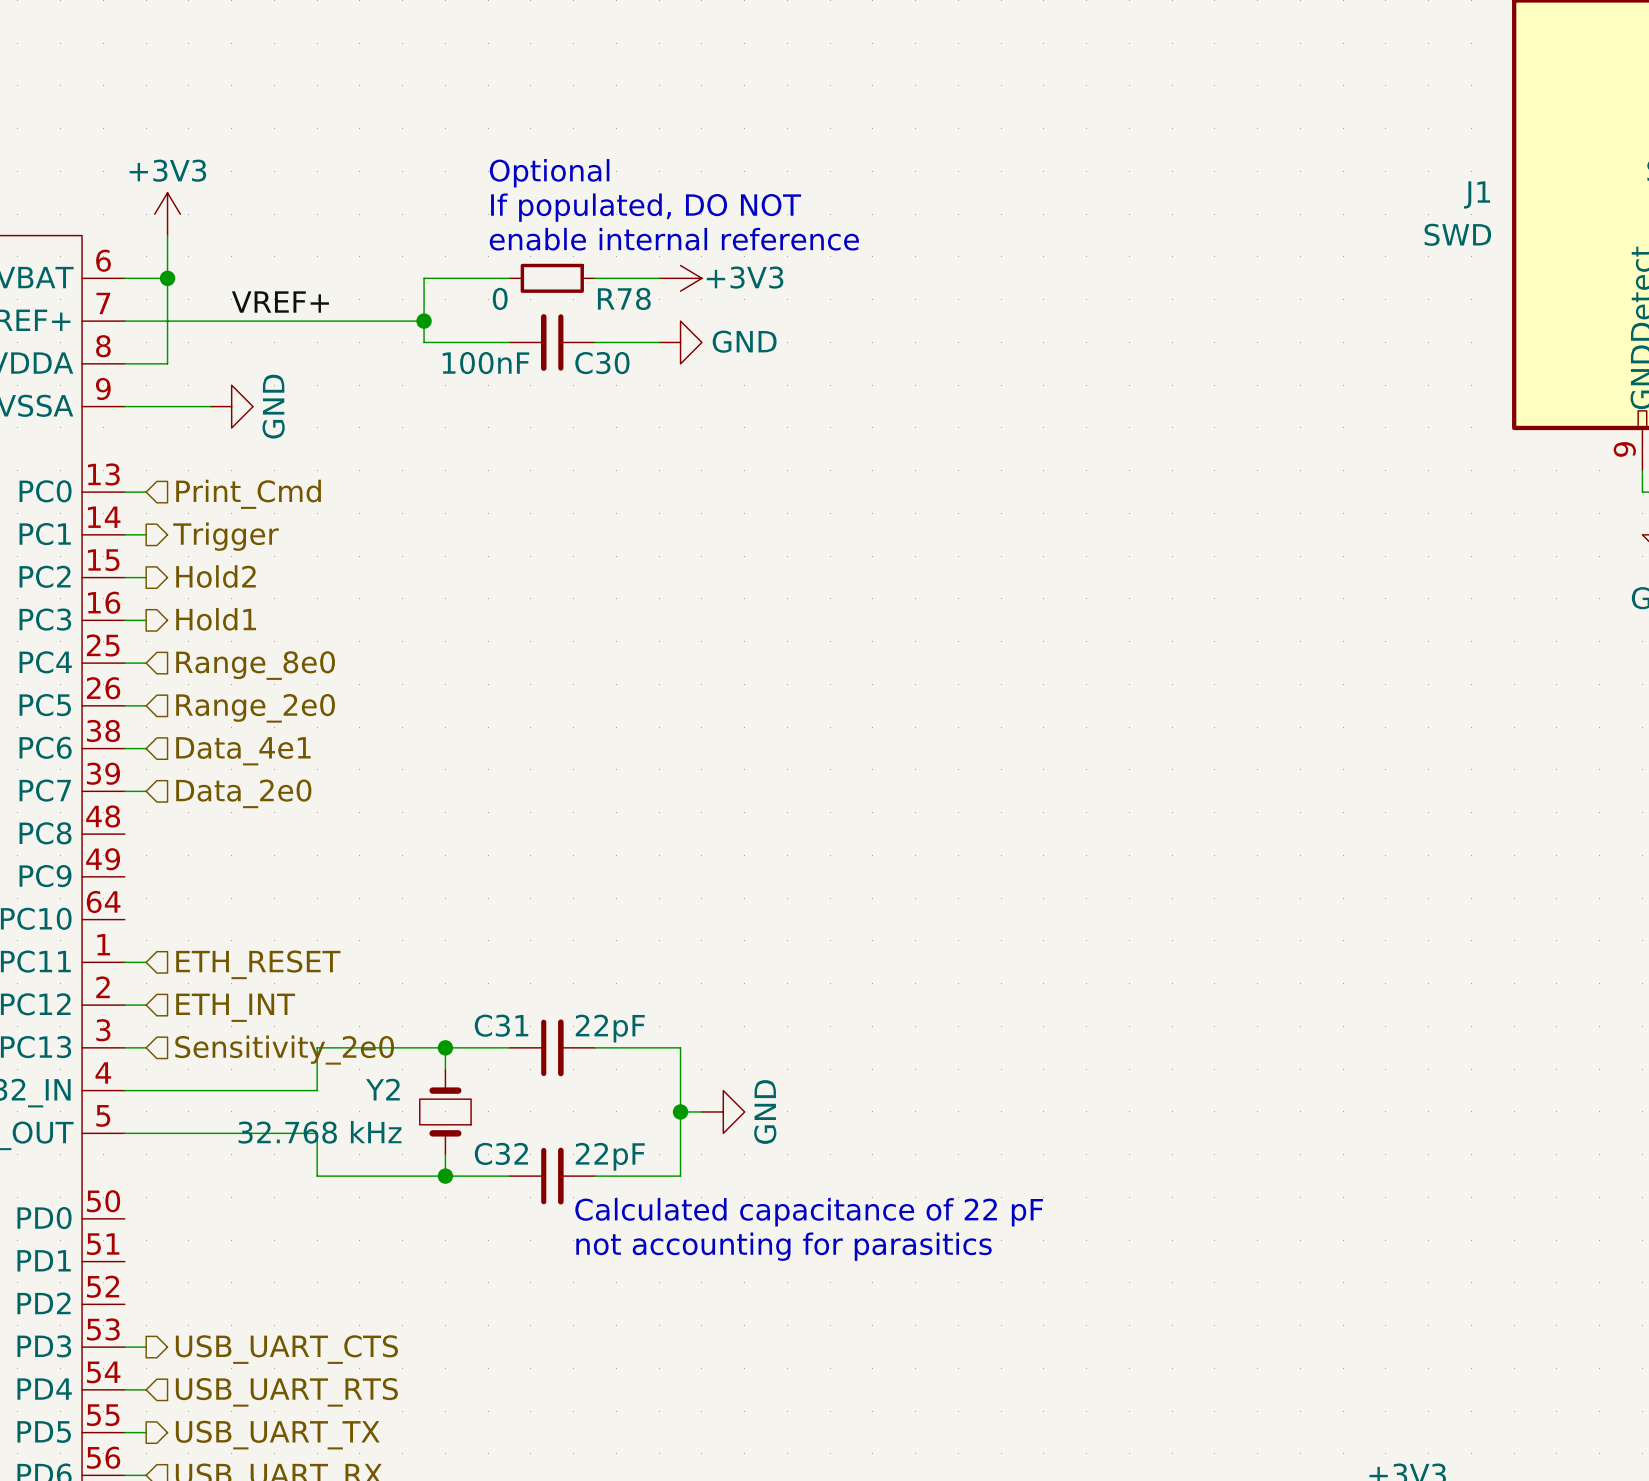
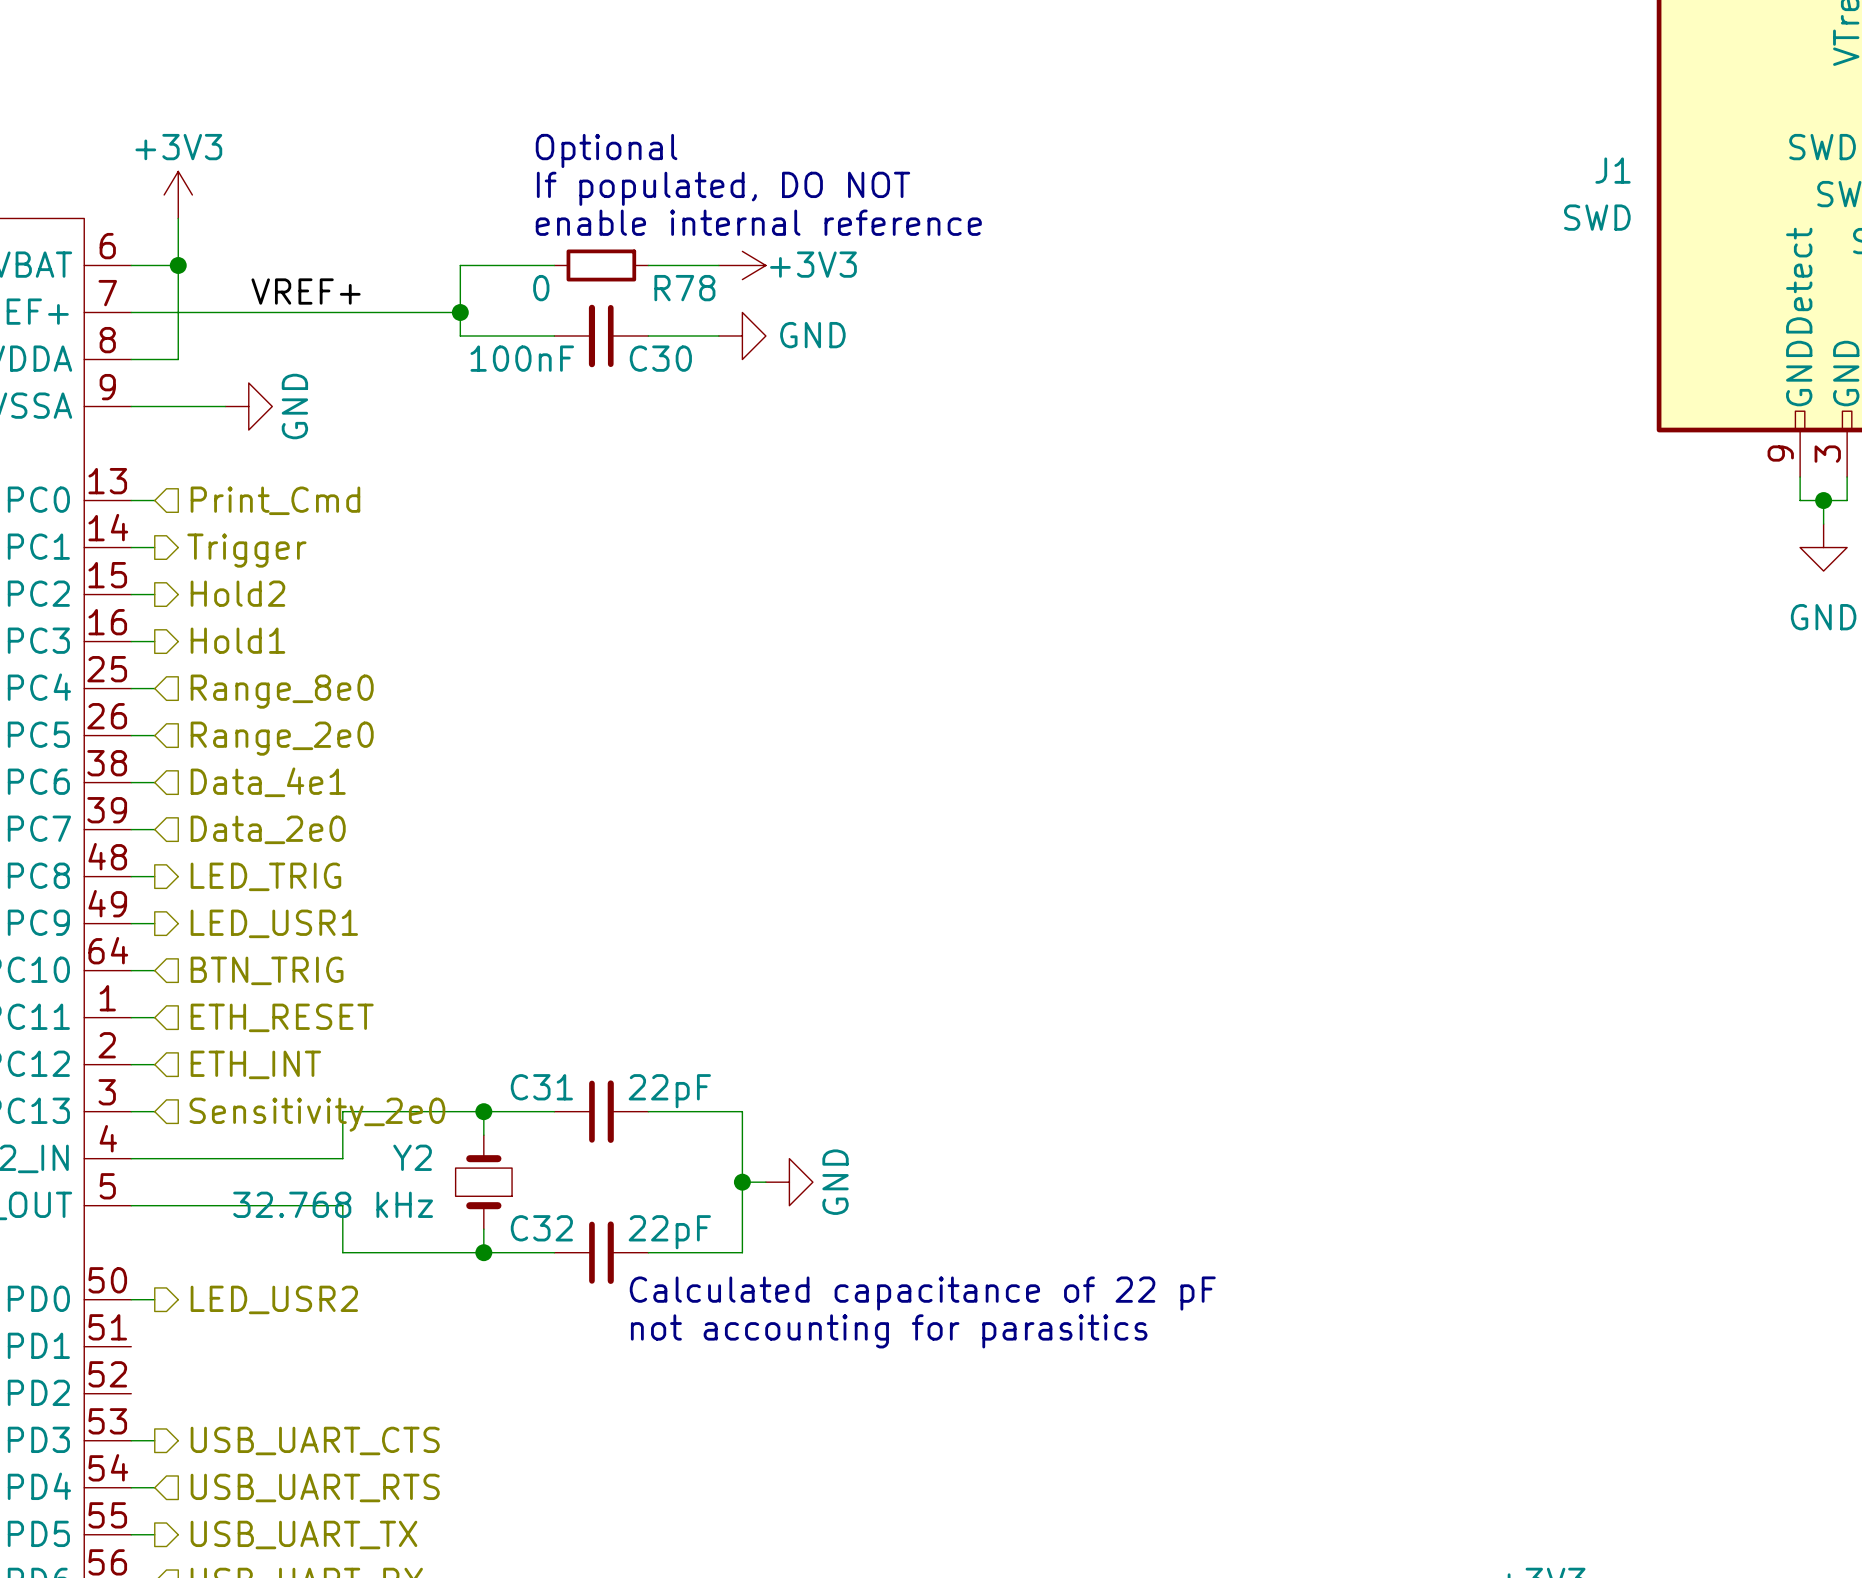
wire: none -> (131, 876) (154, 876)
hierarchical label: none -> LED_TRIG (265, 876)
wire: none -> (131, 923) (154, 923)
hierarchical label: none -> LED_USR1 (274, 923)
wire: none -> (131, 970) (154, 970)
hierarchical label: none -> BTN_TRIG (267, 970)
wire: none -> (131, 1299) (154, 1299)
hierarchical label: none -> LED_USR2 (274, 1299)

